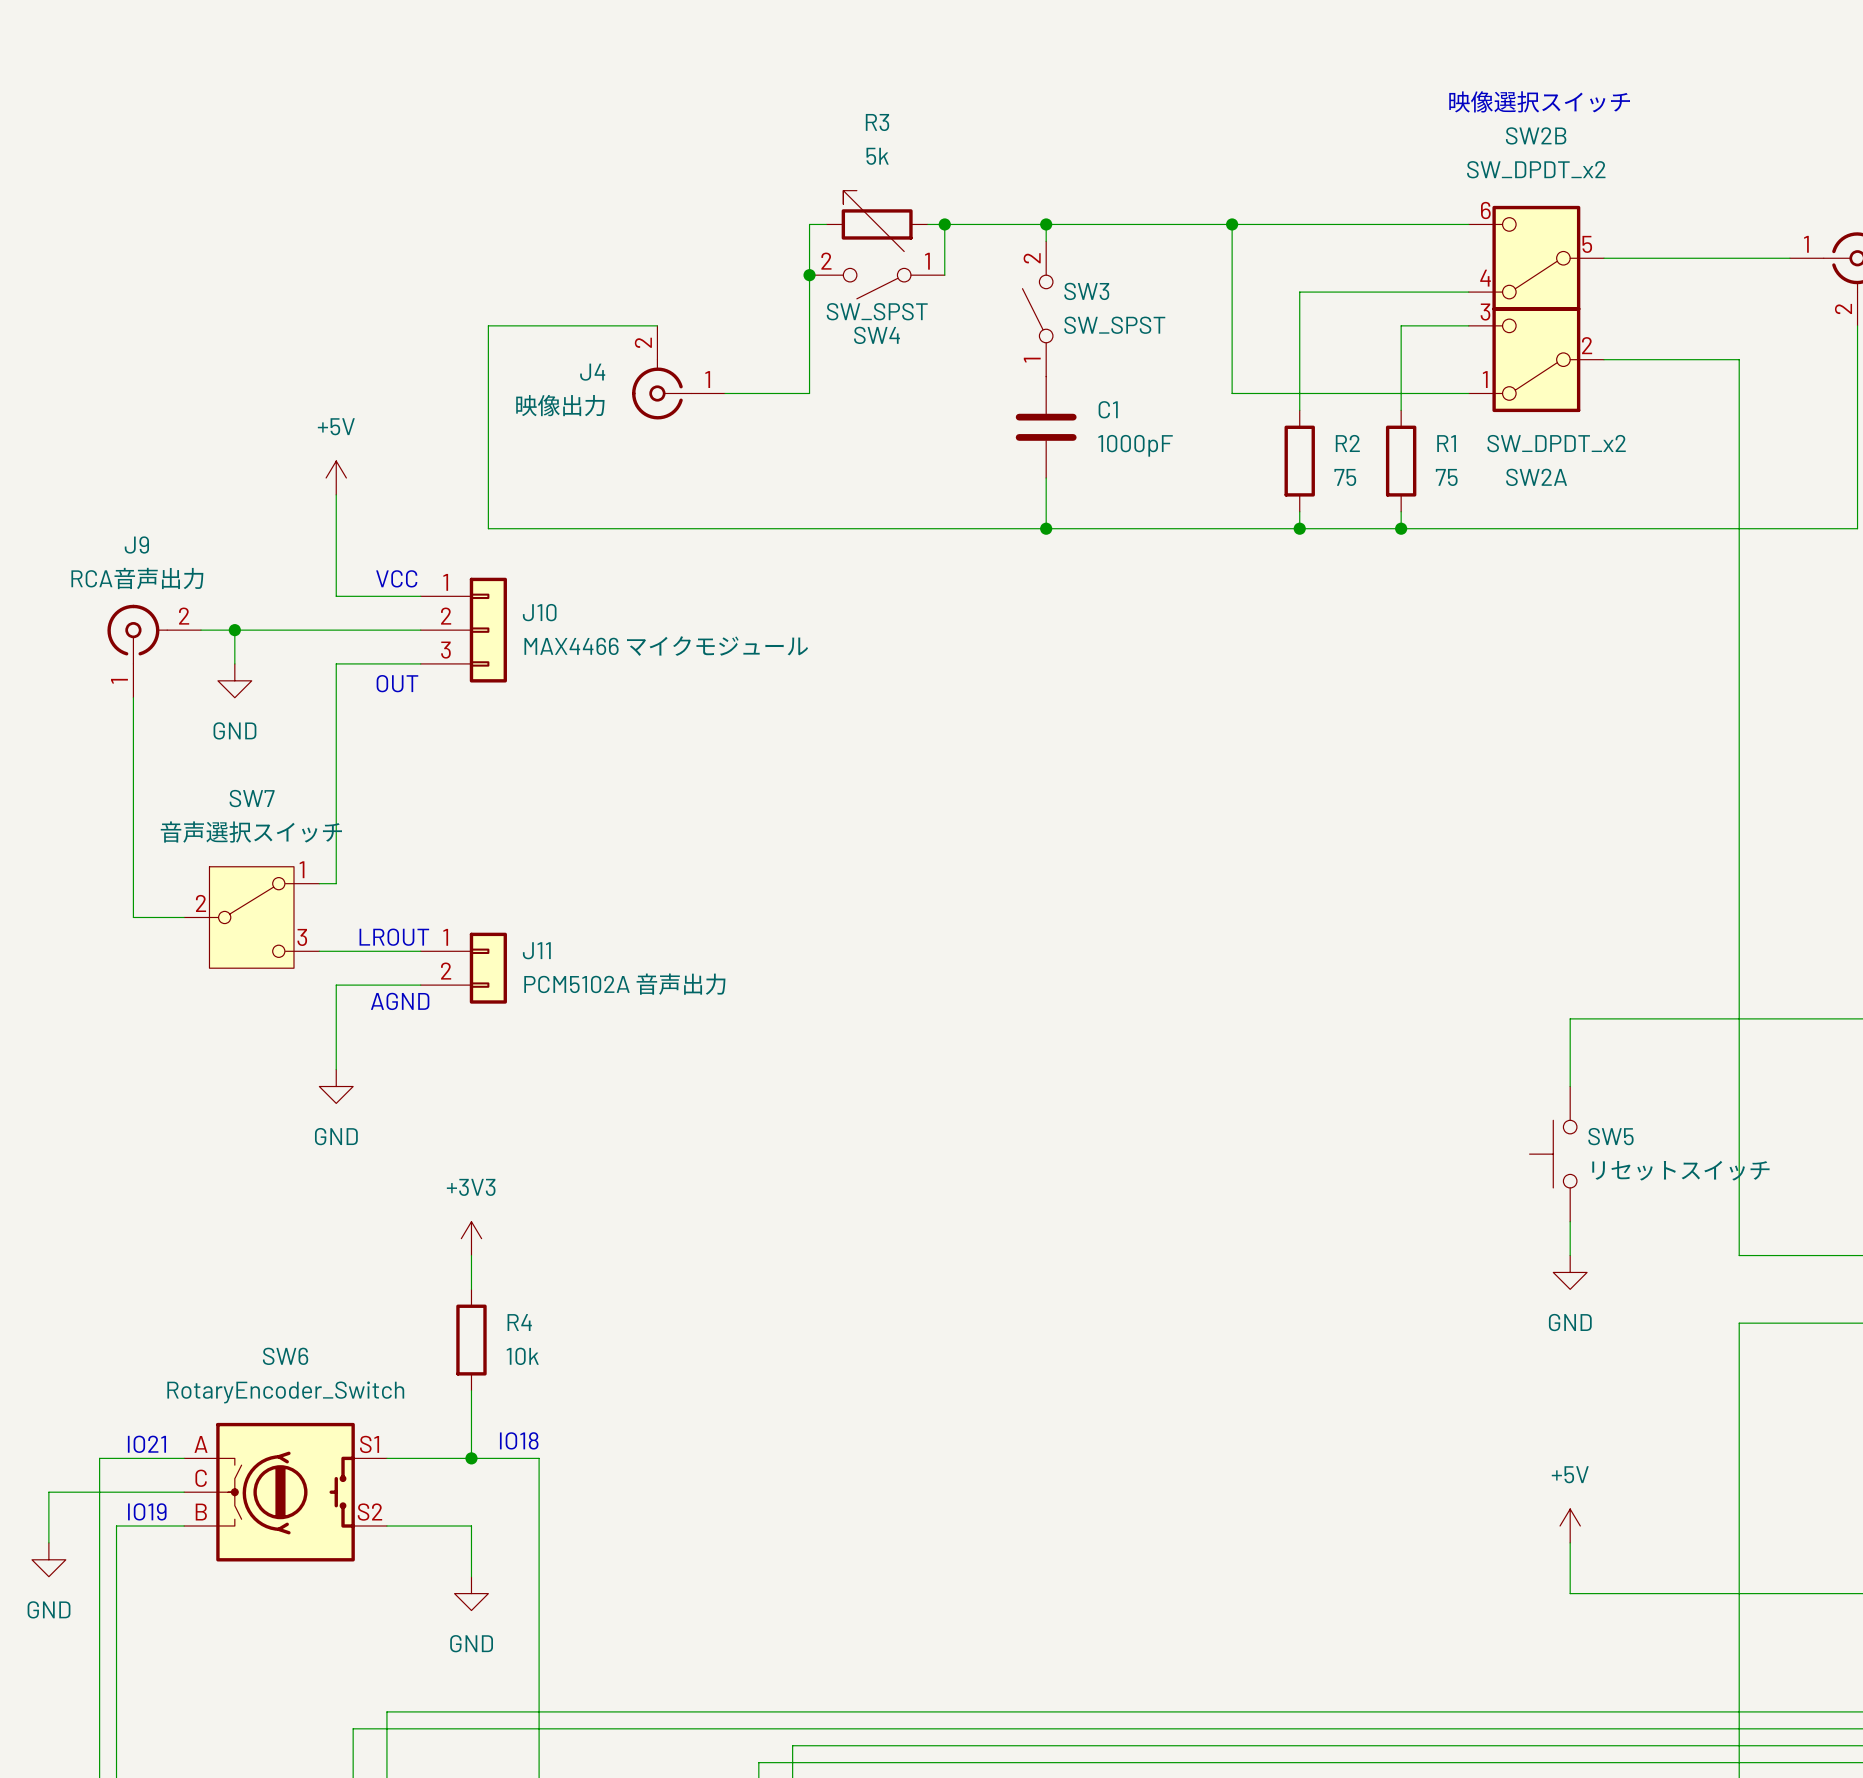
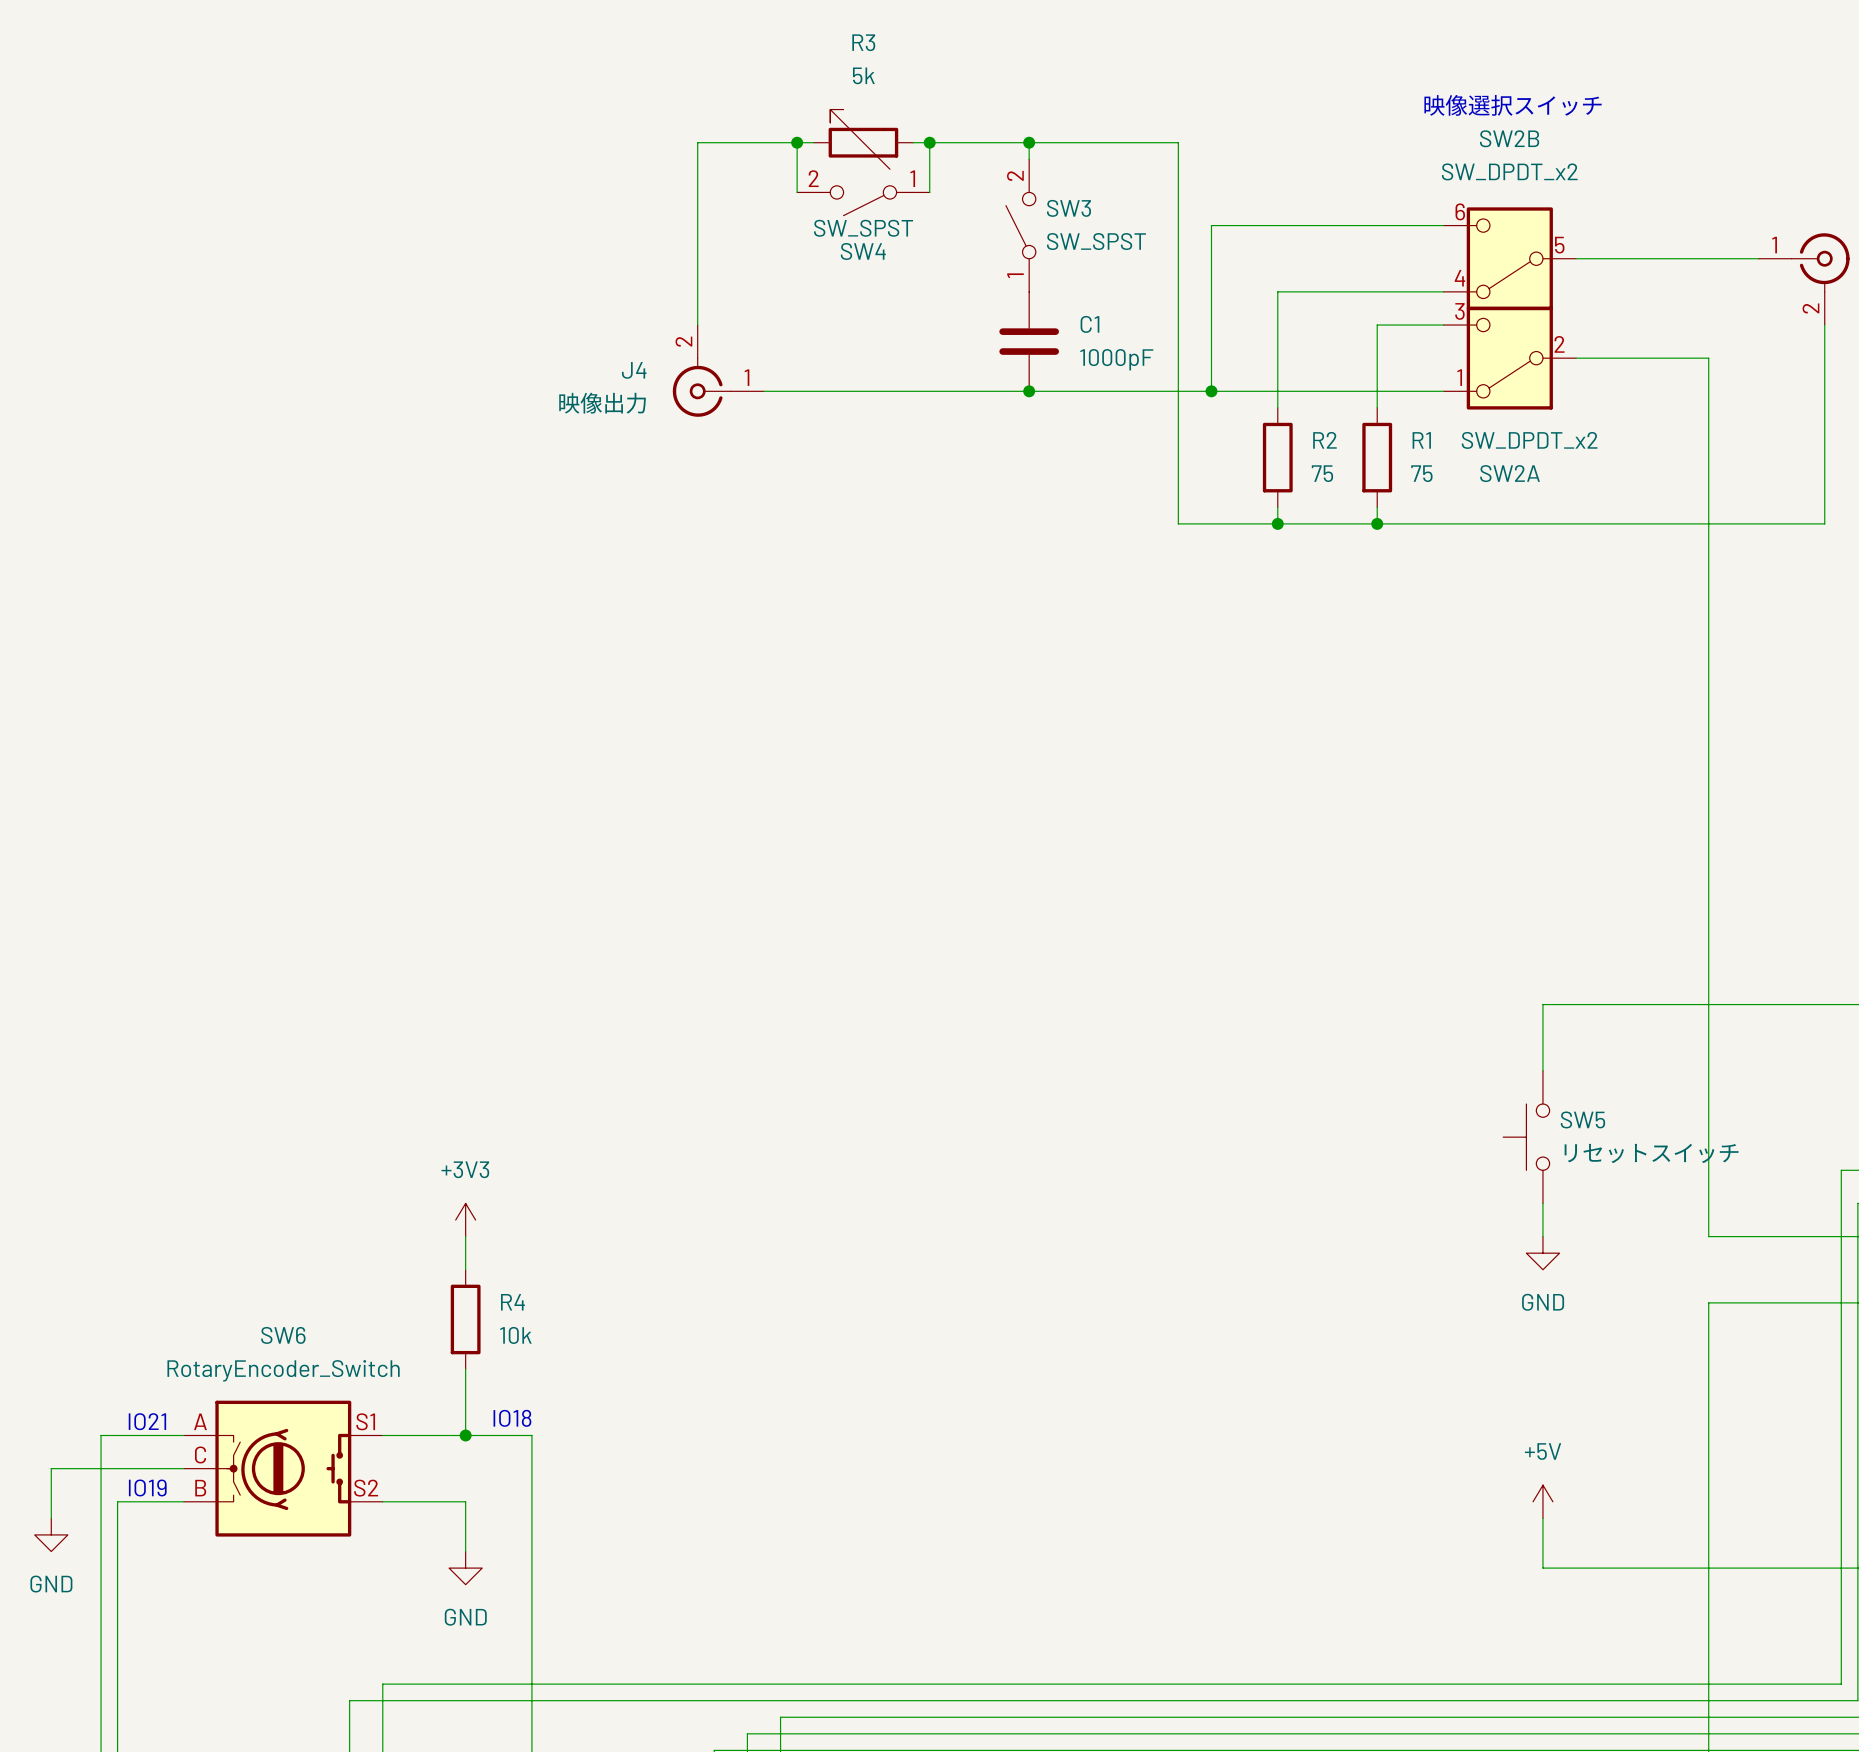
wire: none -> (797, 142) (797, 192)
junction: none -> (797, 142)
wire: none -> (813, 142) (697, 142) (697, 325)
junction: none -> (929, 142)
junction: none -> (1029, 142)
R3 position: (877, 221) -> (863, 139)
wire: (826, 224) (809, 224) (809, 393) -> (1211, 391) (797, 391)
wire: (927, 224) (1232, 224) -> none
wire: (944, 224) (944, 275) -> (929, 142) (929, 192)
junction: (944, 224) -> none
wire: (1046, 224) (1046, 241) -> (1029, 142) (1029, 159)
junction: (1046, 224) -> none
junction: (1232, 224) -> none
junction: (809, 275) -> none
SW4 position: (877, 283) -> (863, 200)
SW3 position: (1037, 308) -> (1020, 225)
wire: (657, 325) (488, 325) (488, 528) (1198, 528) -> (913, 142) (1178, 142) (1178, 523)
J4 position: (678, 372) -> (718, 370)
junction: none -> (1029, 391)
junction: none -> (1211, 391)
C1 position: (1046, 427) -> (1029, 341)
power symbol: +5V (336, 478) -> none
wire: (1046, 478) (1046, 528) -> none
wire: (336, 494) (336, 596) (420, 596) -> none
junction: (1046, 528) -> none
text: VCC (396, 578) -> none
wire: (201, 630) (420, 630) -> none
wire: (234, 630) (234, 663) -> none
junction: (234, 630) -> none
J10: MAX4466 マイクモジュール (463, 630) -> none
J9: RCA音声出力 (154, 651) -> none
wire: (420, 663) (336, 663) (336, 883) (319, 883) -> none
power symbol: GND (234, 680) -> none
text: OUT (397, 683) -> none
wire: (133, 697) (133, 917) (184, 917) -> none
SW7: 音声選択スイッチ (251, 917) -> none
text: LROUT (394, 937) -> none
wire: (319, 951) (420, 951) -> none
J11: PCM5102A 音声出力 (463, 968) -> none
wire: (420, 985) (336, 985) (336, 1069) -> none
text: AGND (400, 1001) -> none
power symbol: GND (336, 1086) -> none

